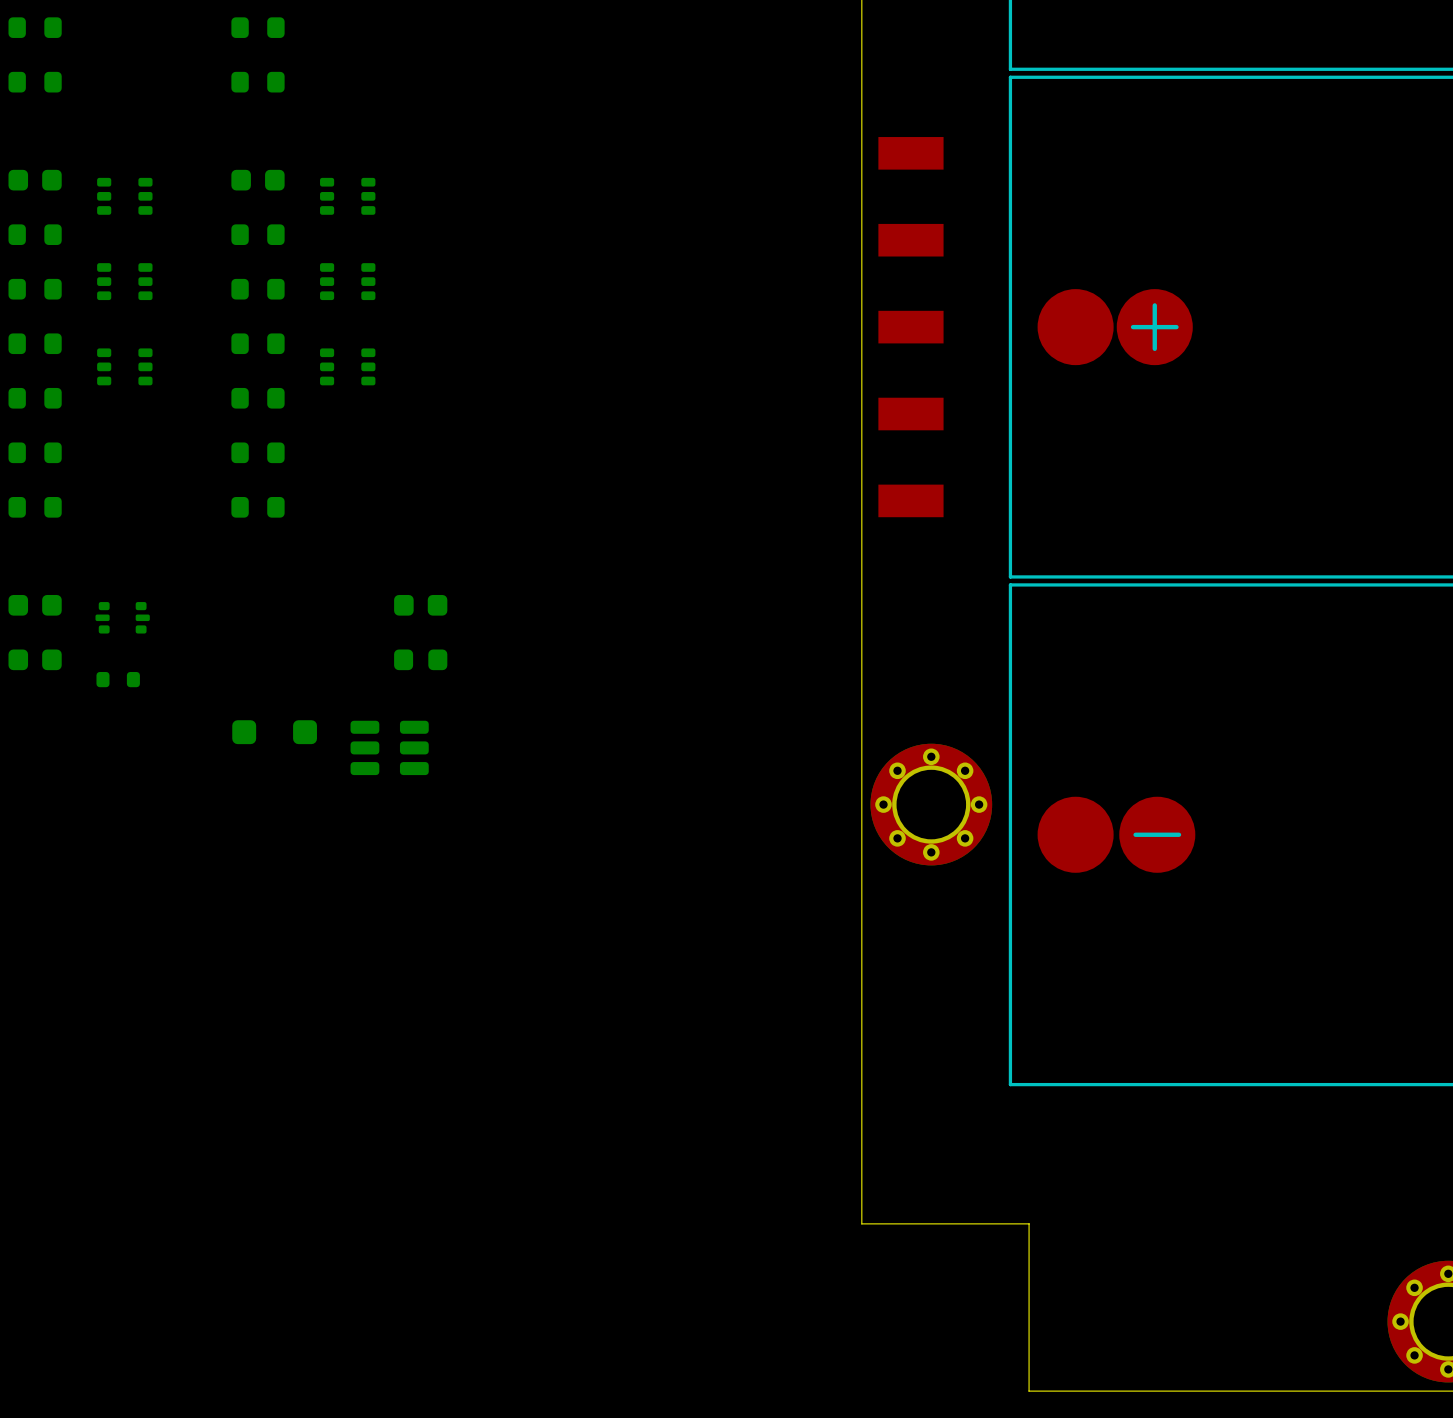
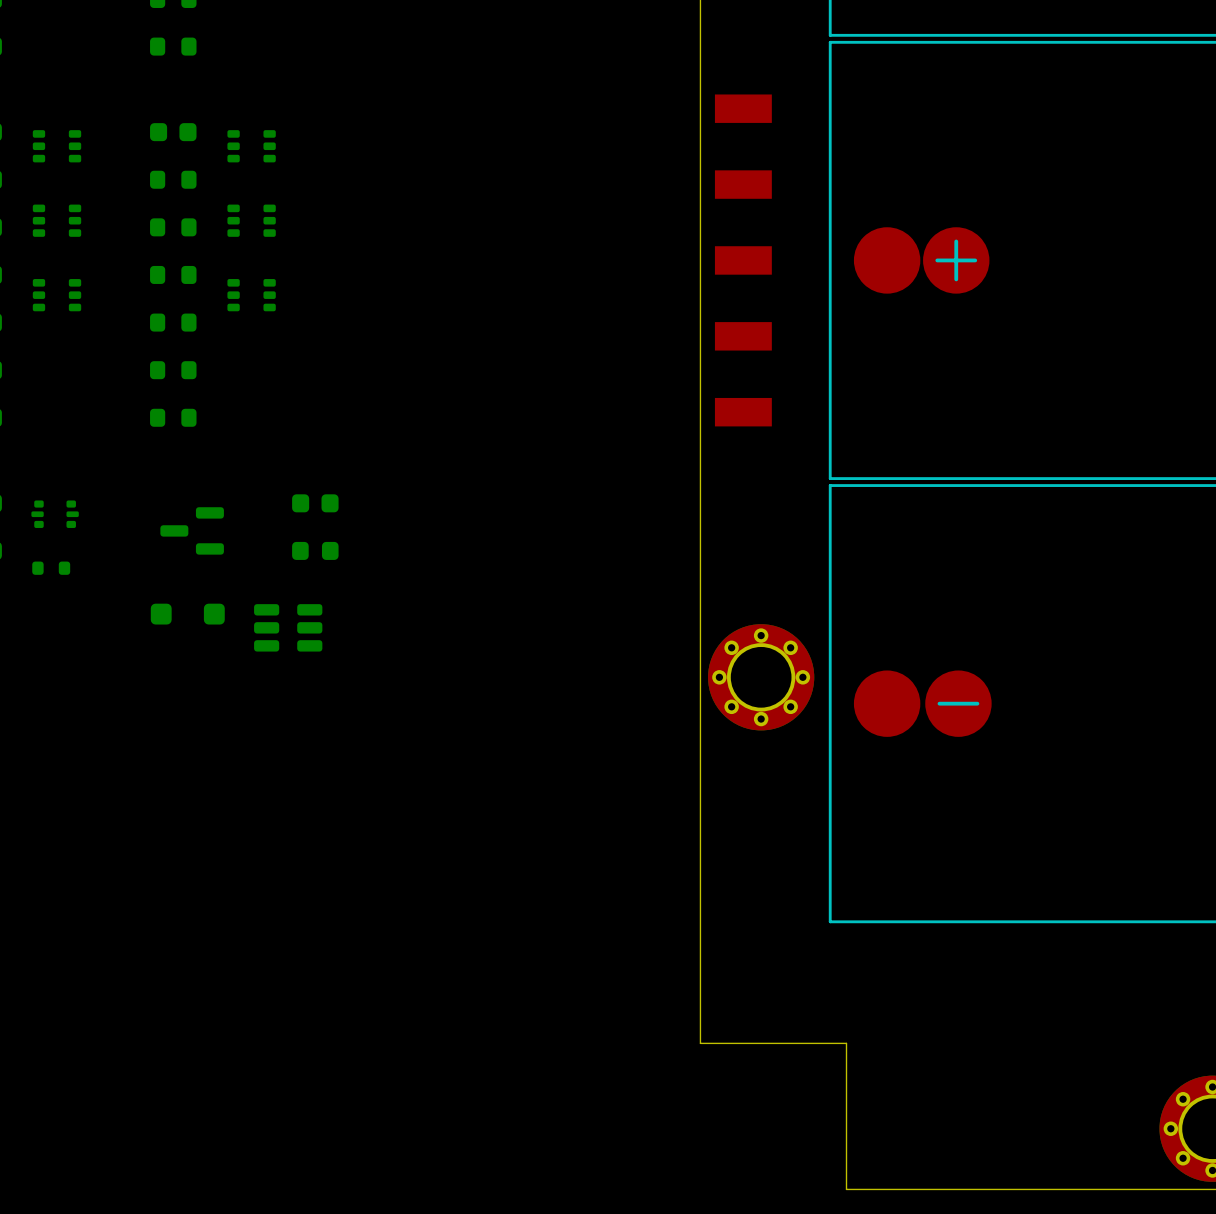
part: none -> (192, 530)

